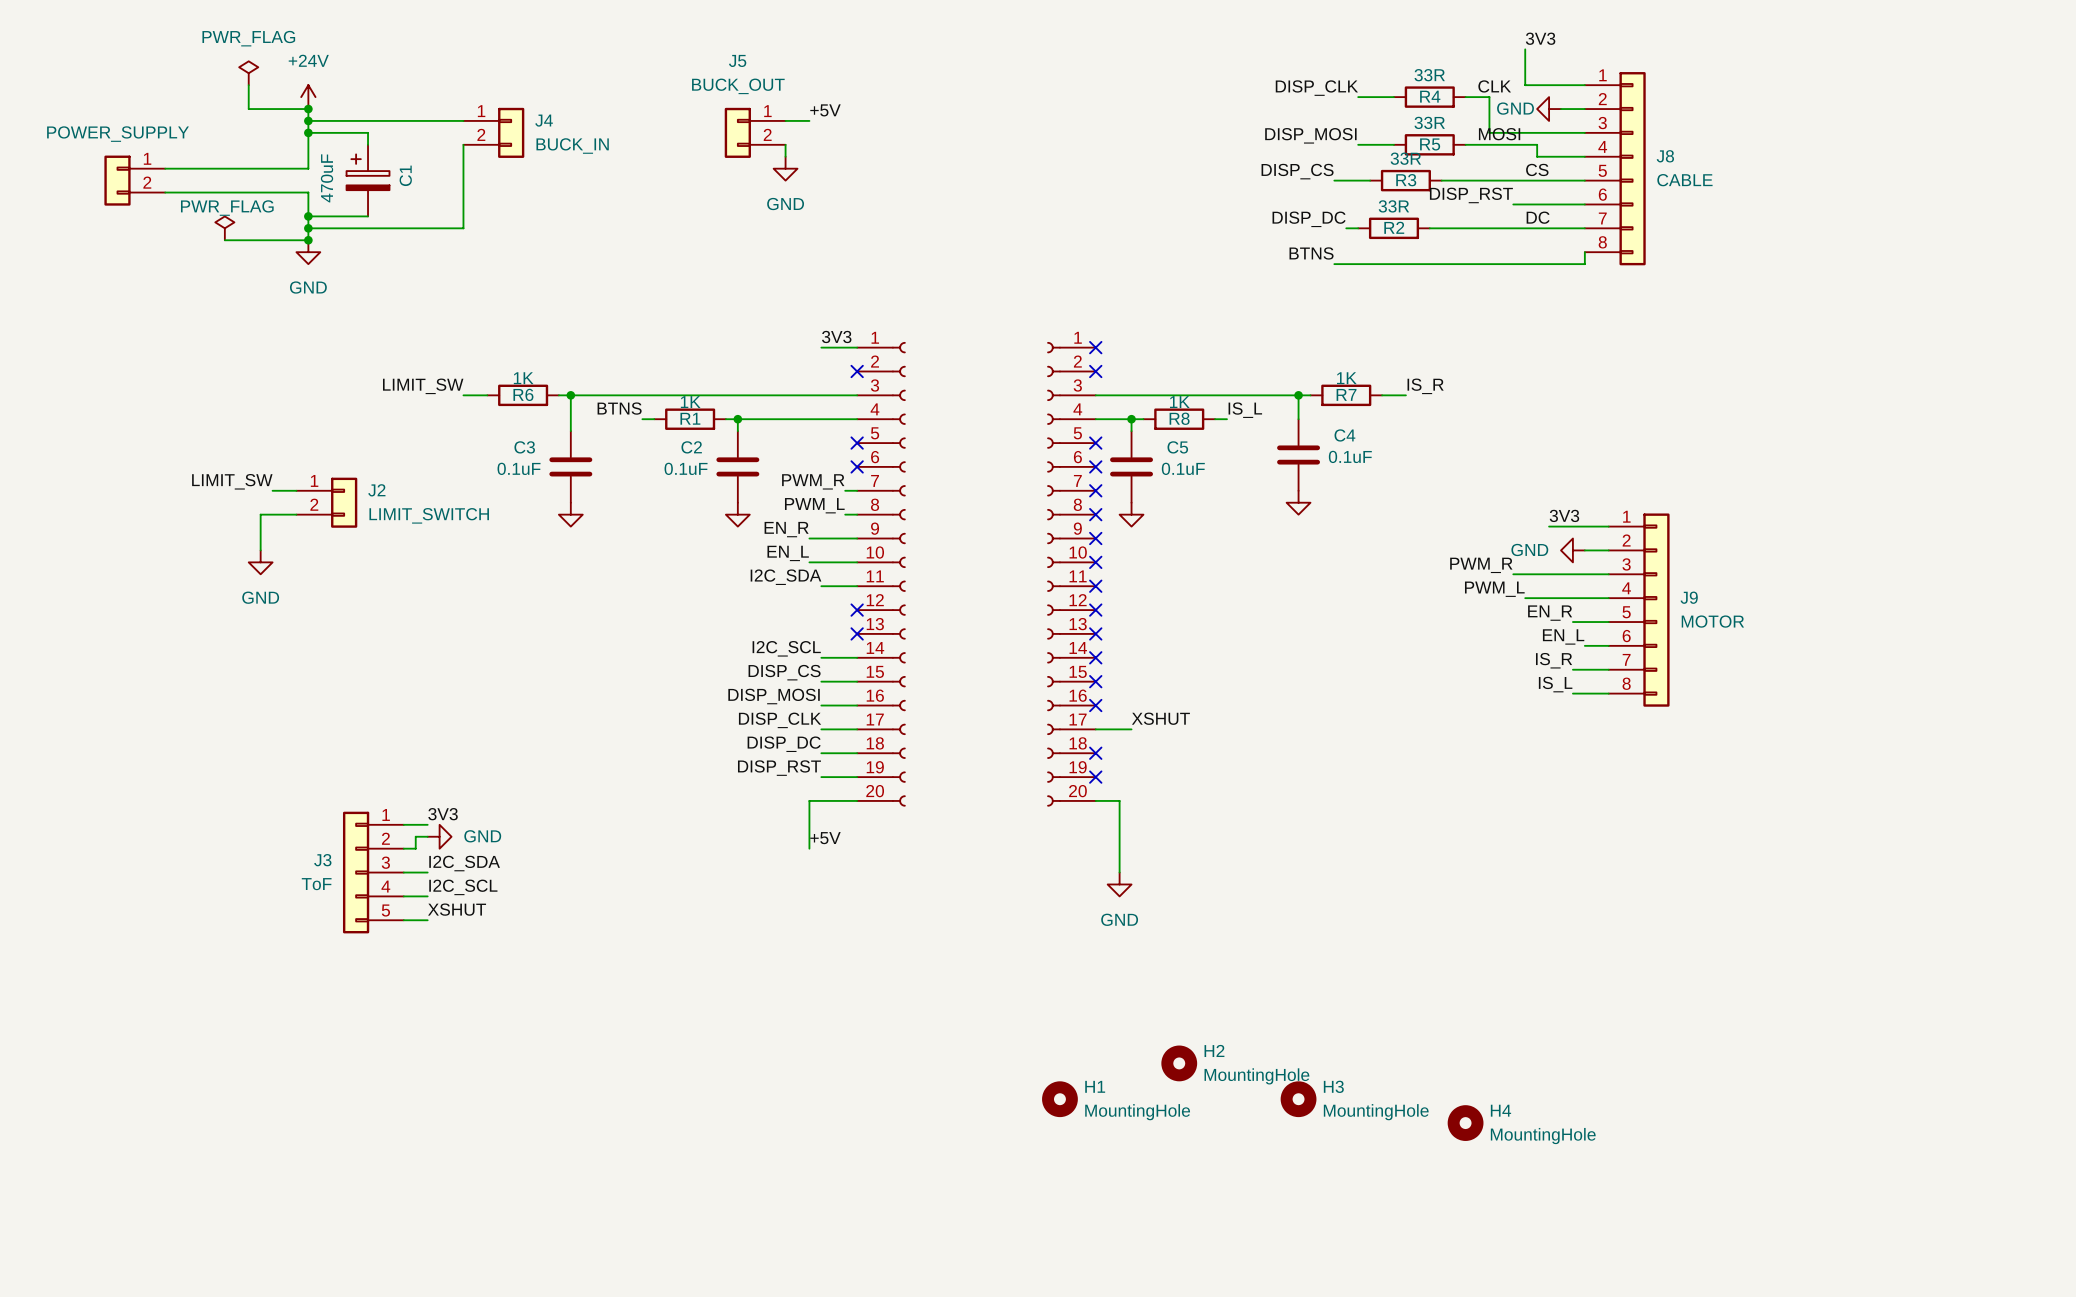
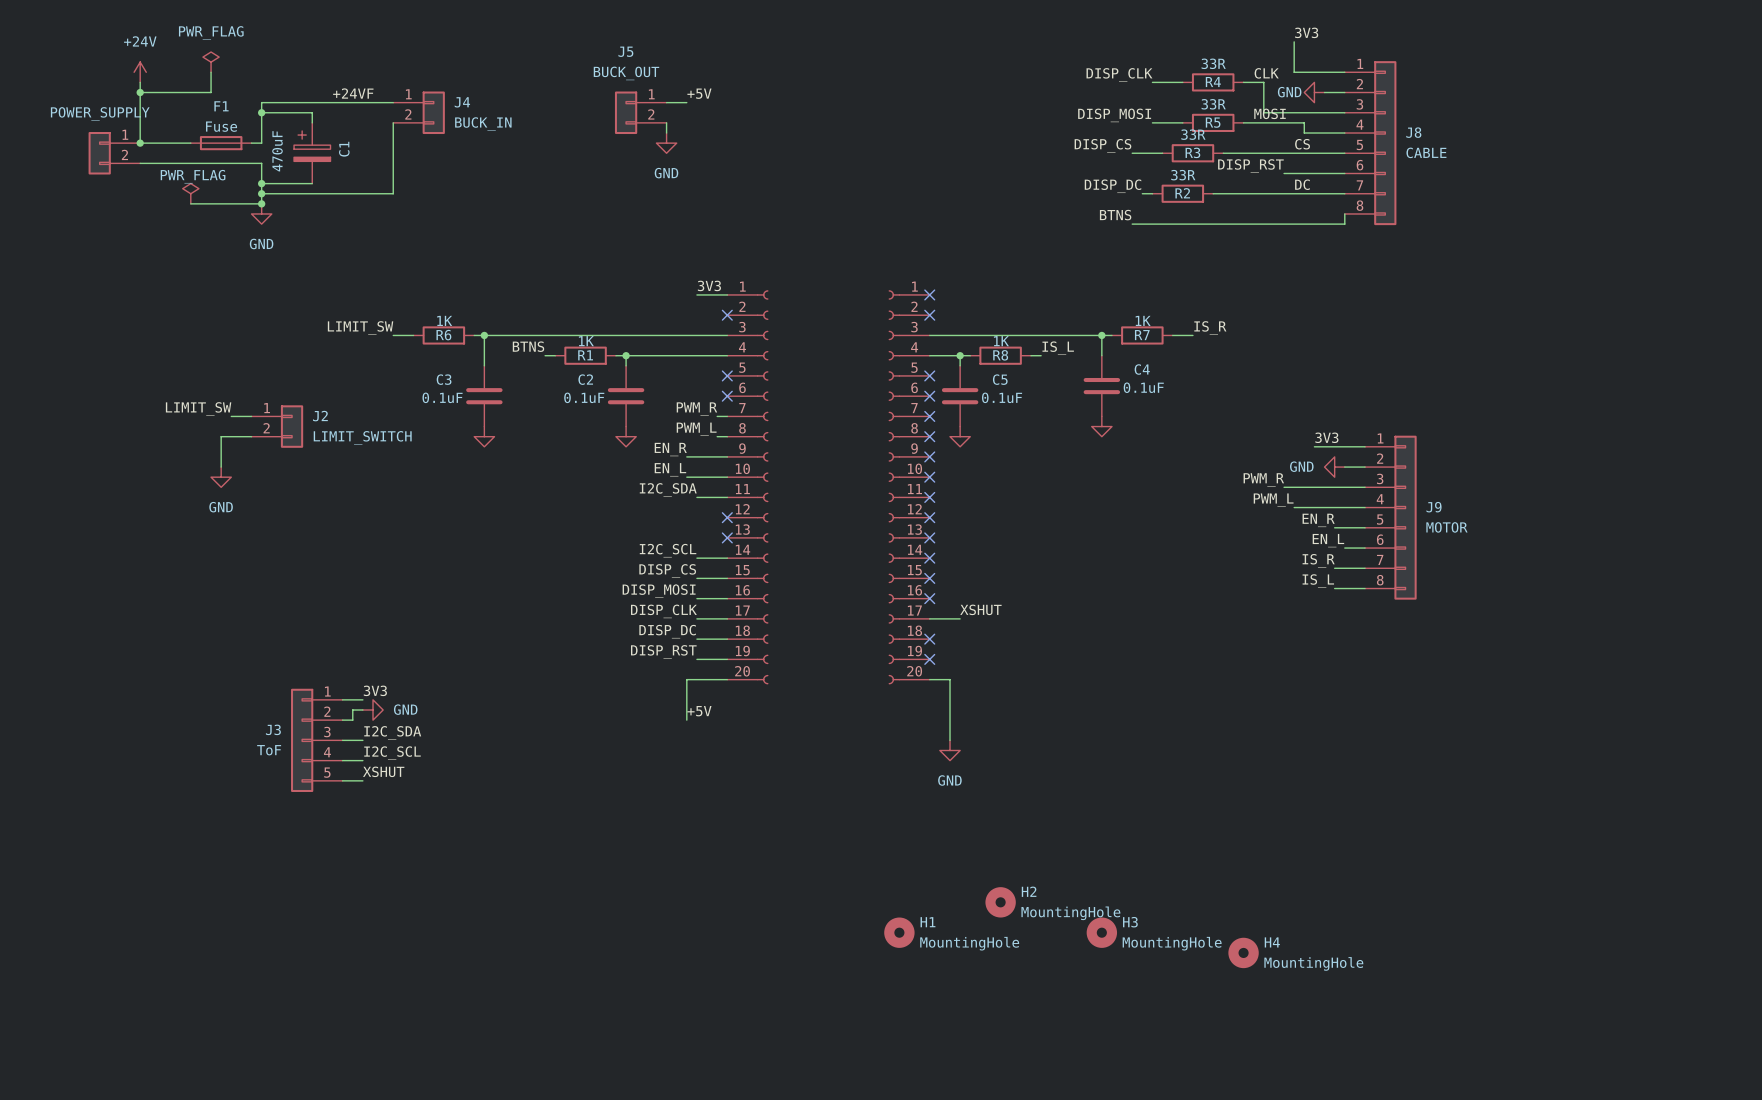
wire: none -> (140, 82) (140, 143)
power symbol position: +24V (308, 97) -> +24V (140, 72)
junction: none -> (140, 92)
wire: (248, 109) (308, 109) (308, 120) -> (211, 92) (140, 92)
junction: (308, 109) -> none
label: none -> +24VF (353, 93)
junction: (308, 120) -> none
junction: none -> (140, 143)
F1: none -> Fuse (221, 143)

